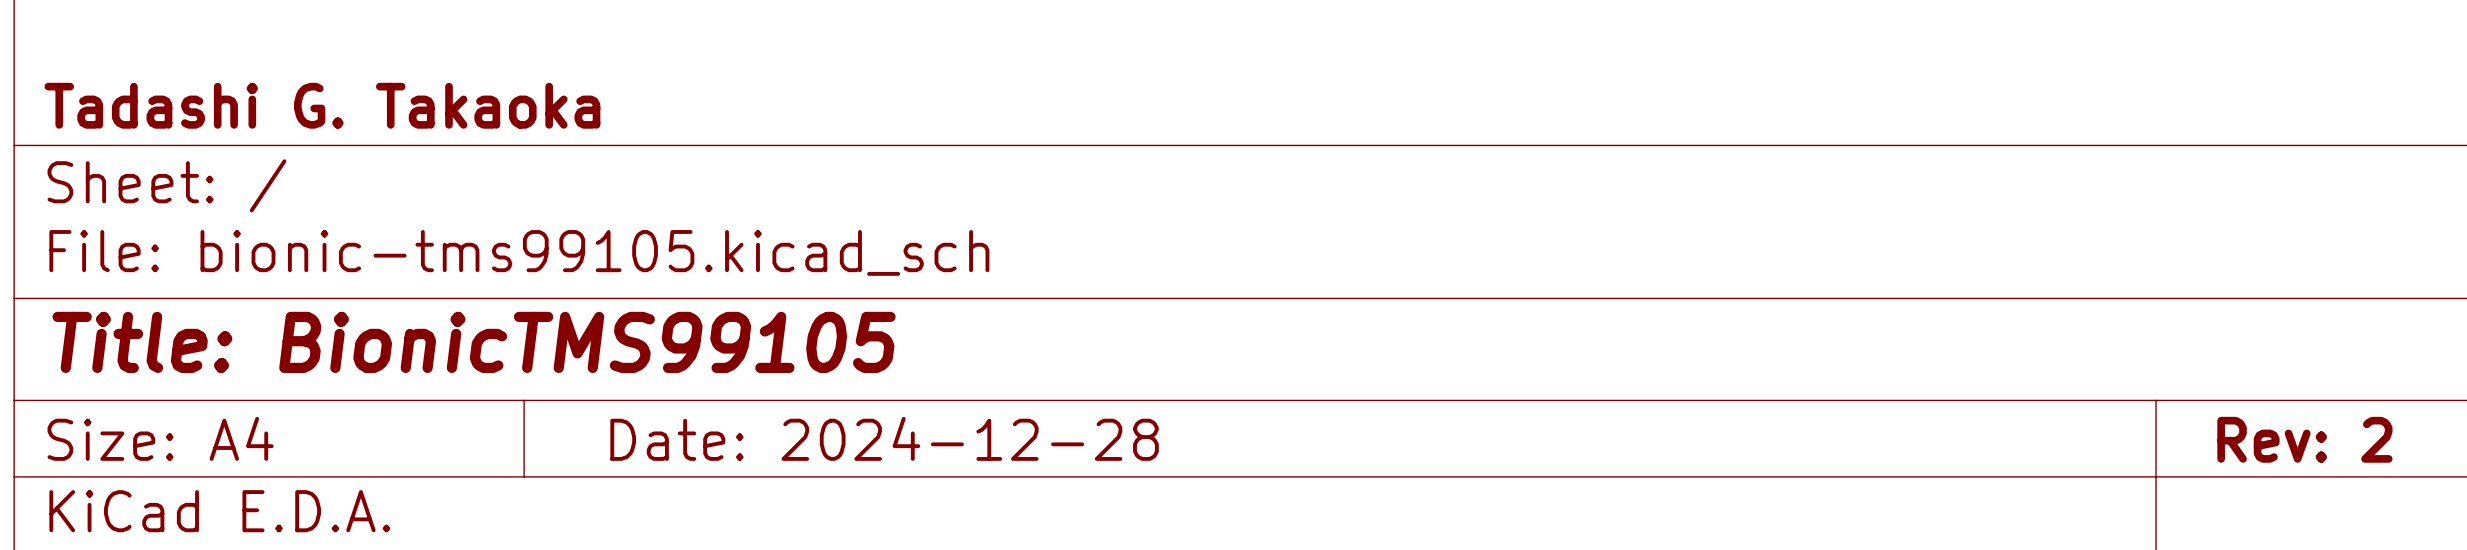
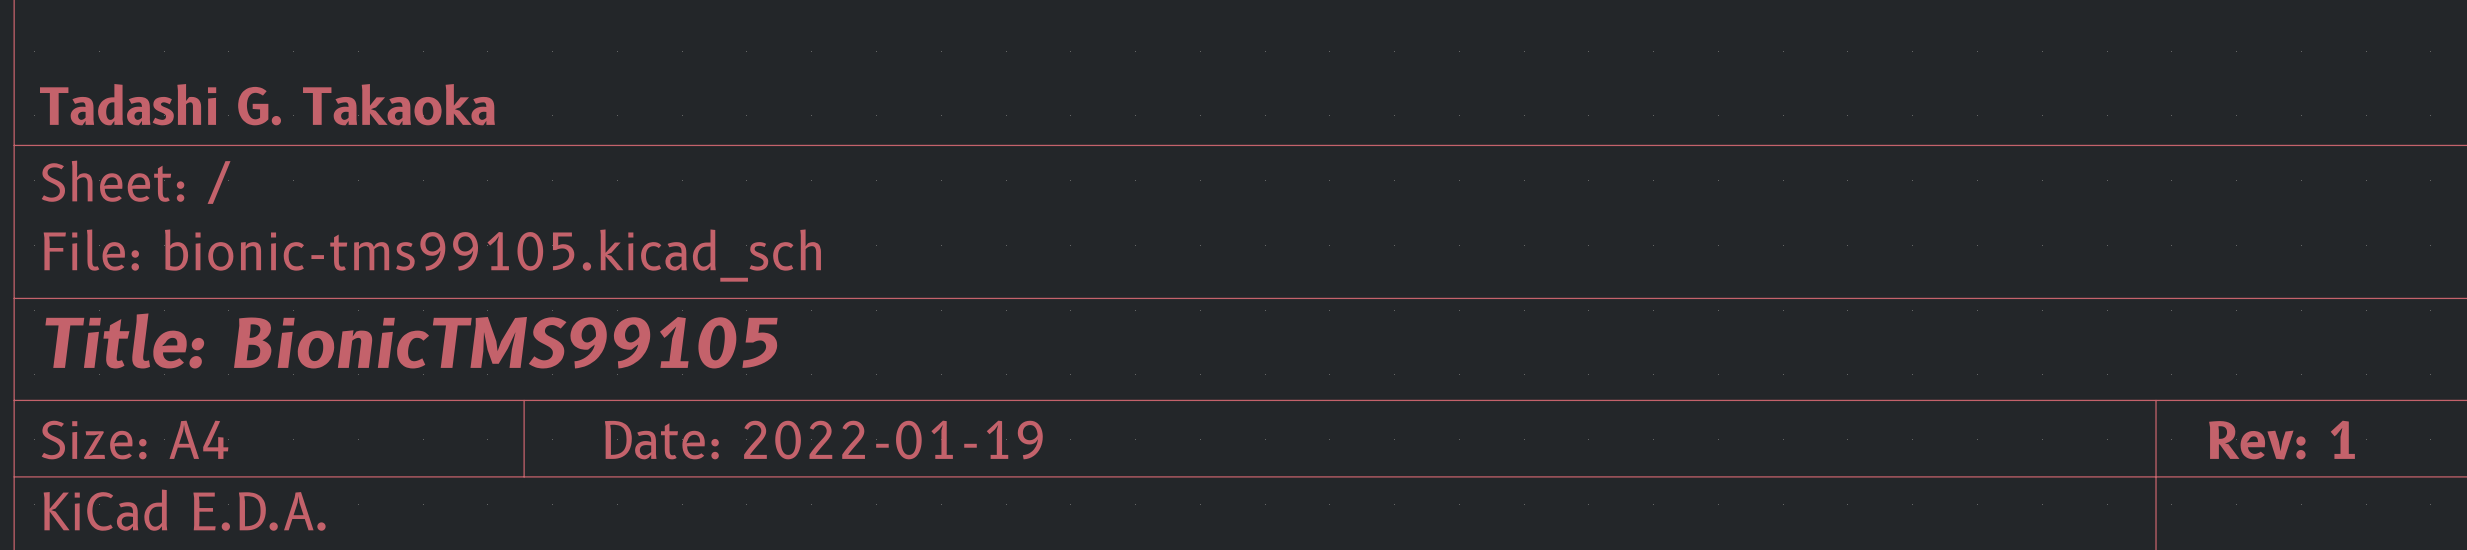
title block: Date: 2024-12-28 (884, 438) -> Date: 2022-01-19 (823, 440)
title block: Rev: 2 (2304, 439) -> Rev: 1 (2282, 440)

